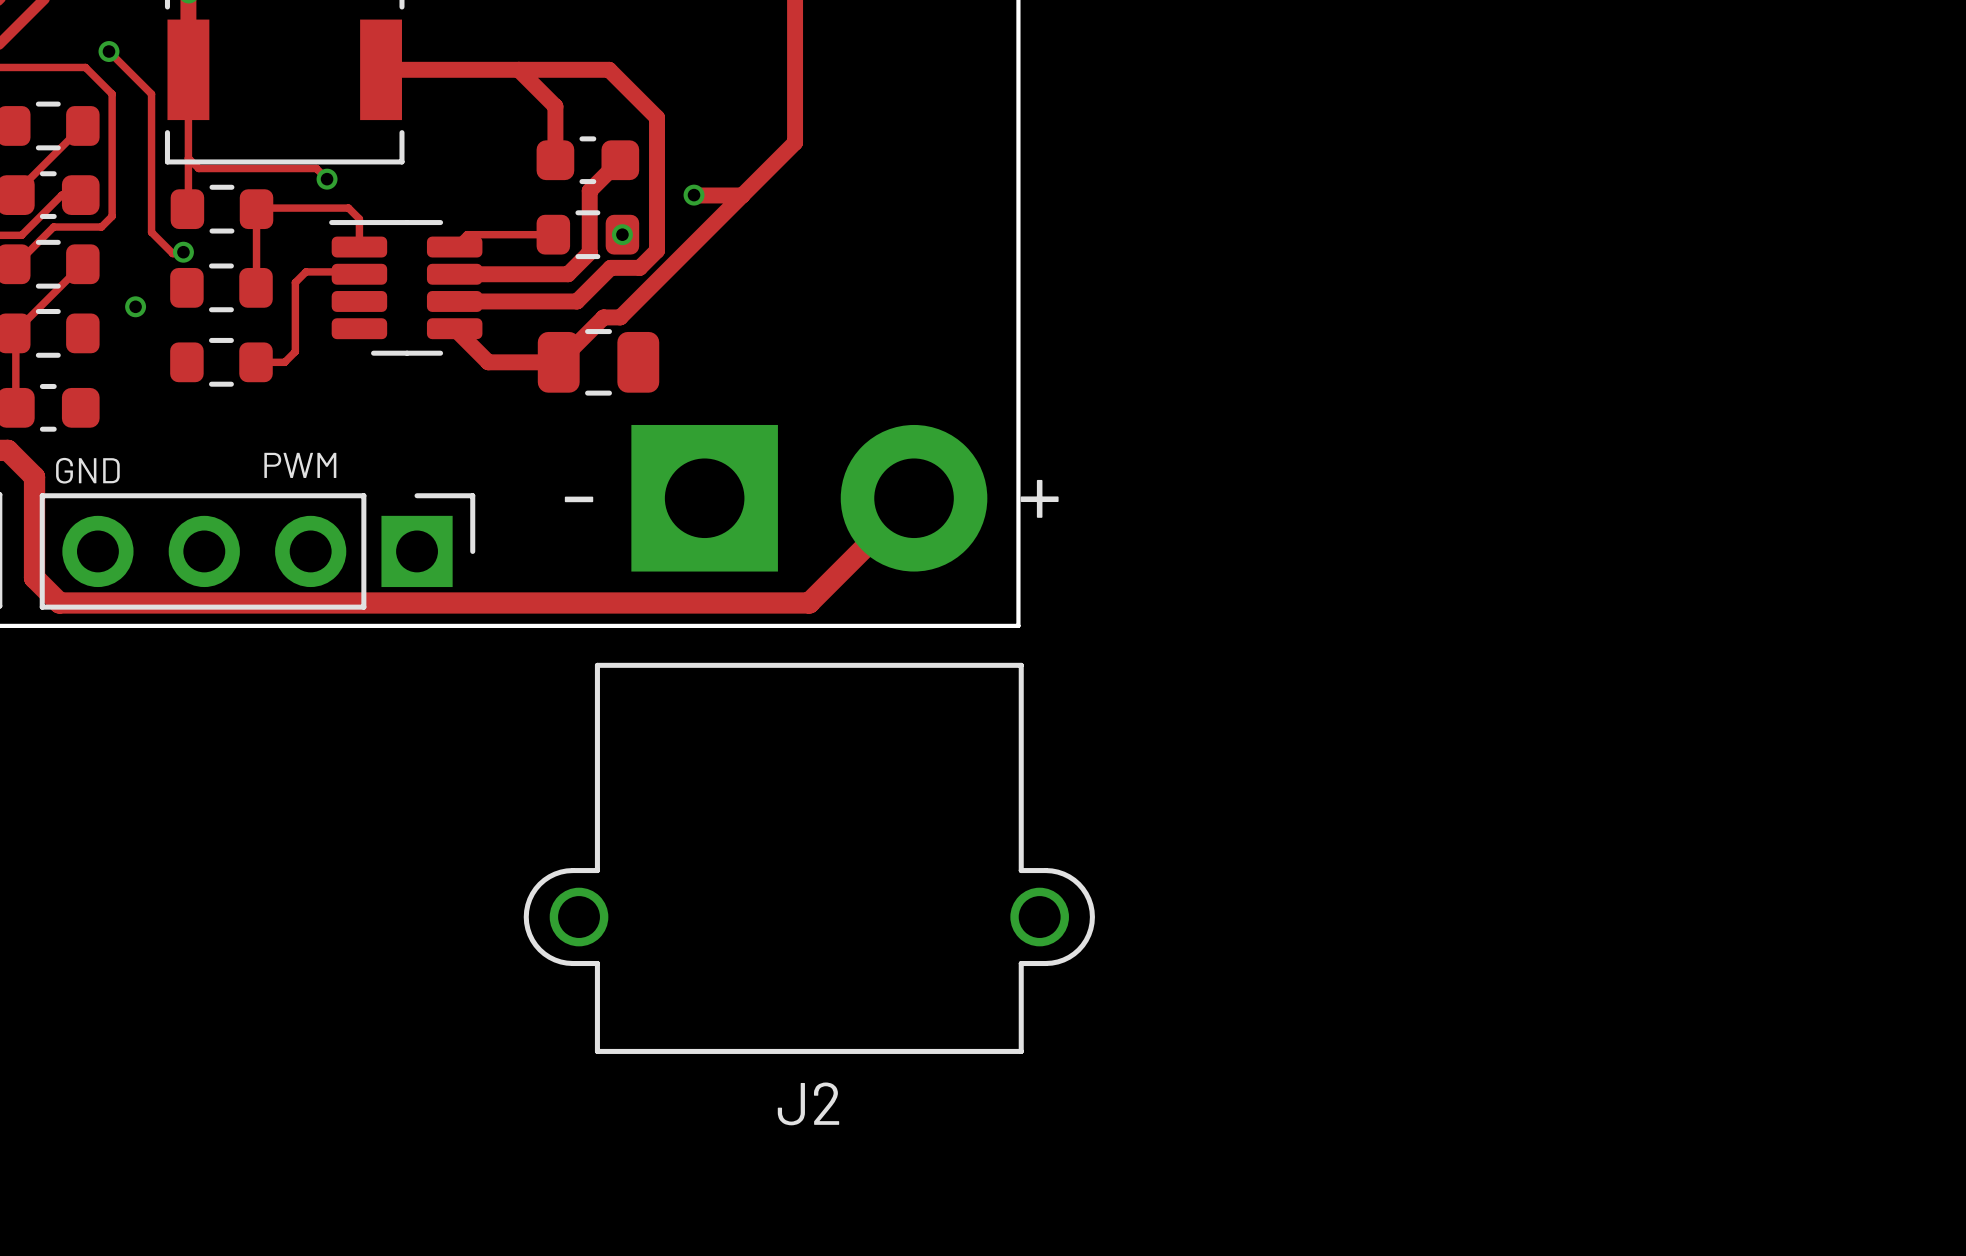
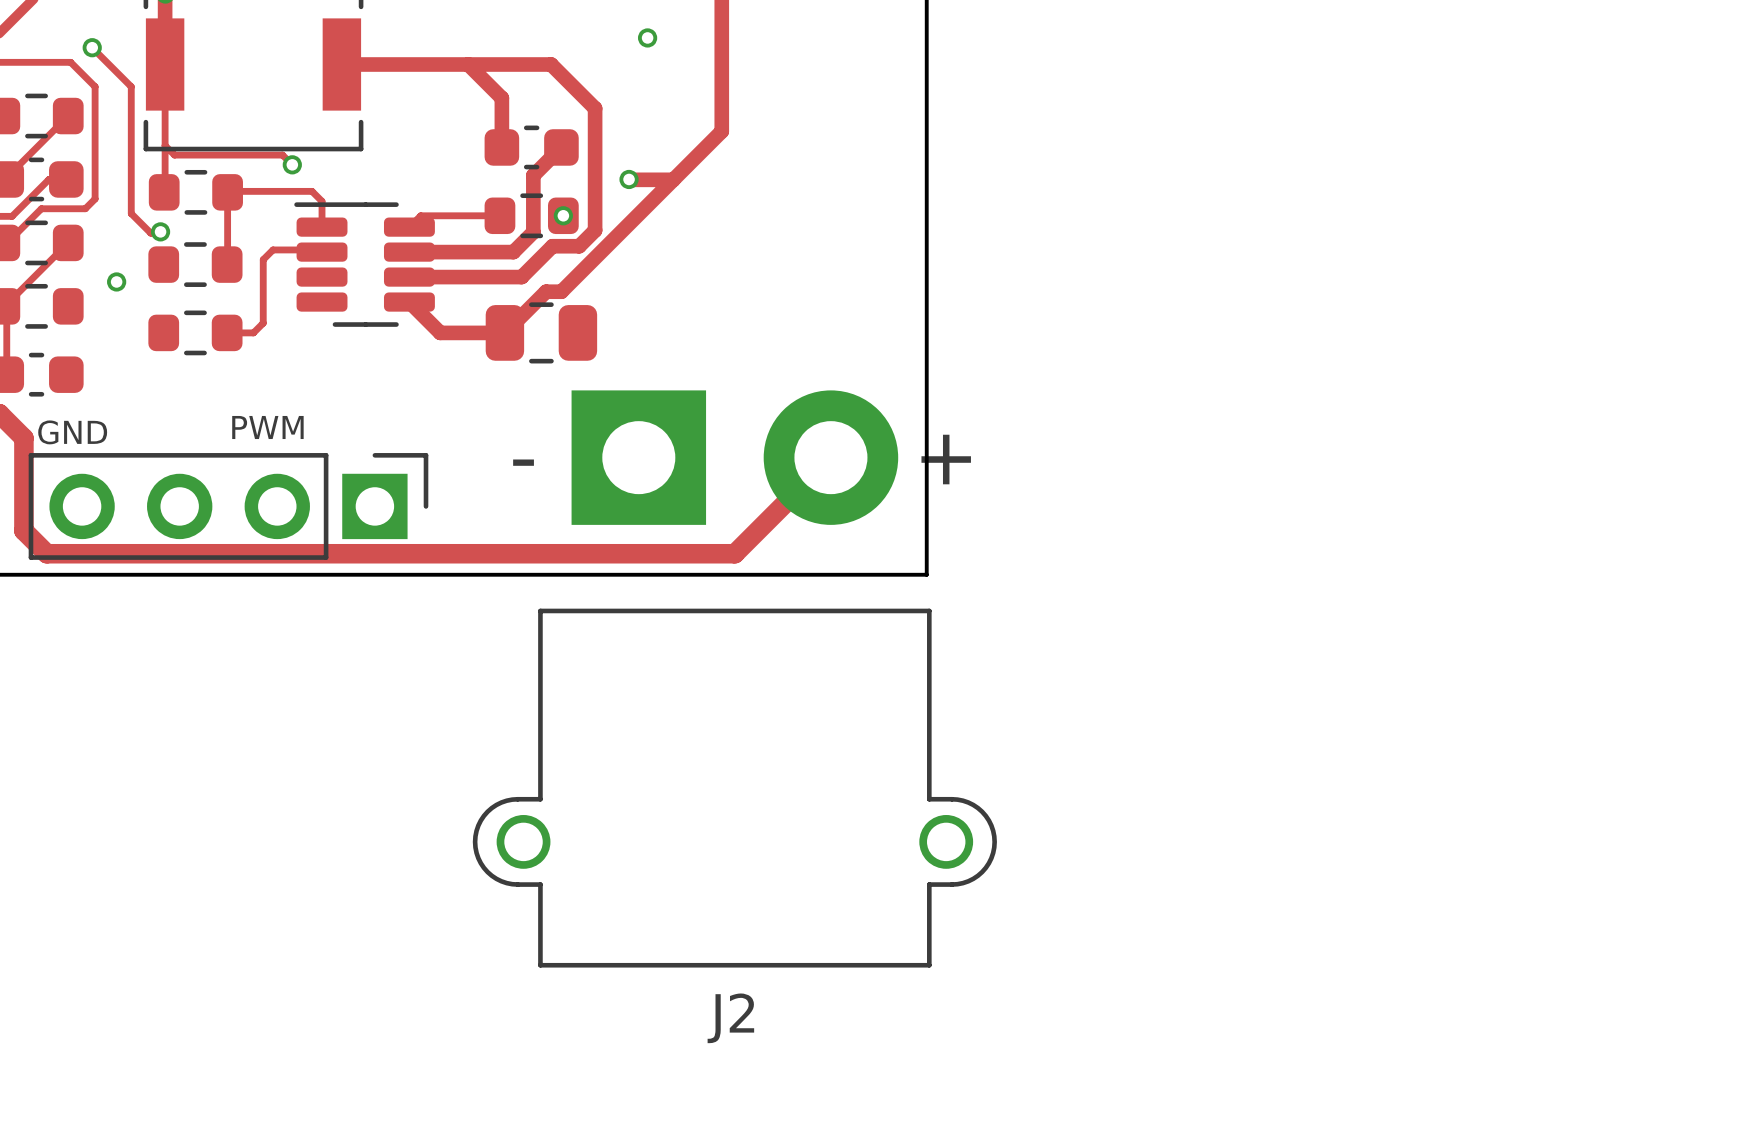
via: none -> (647, 37)

